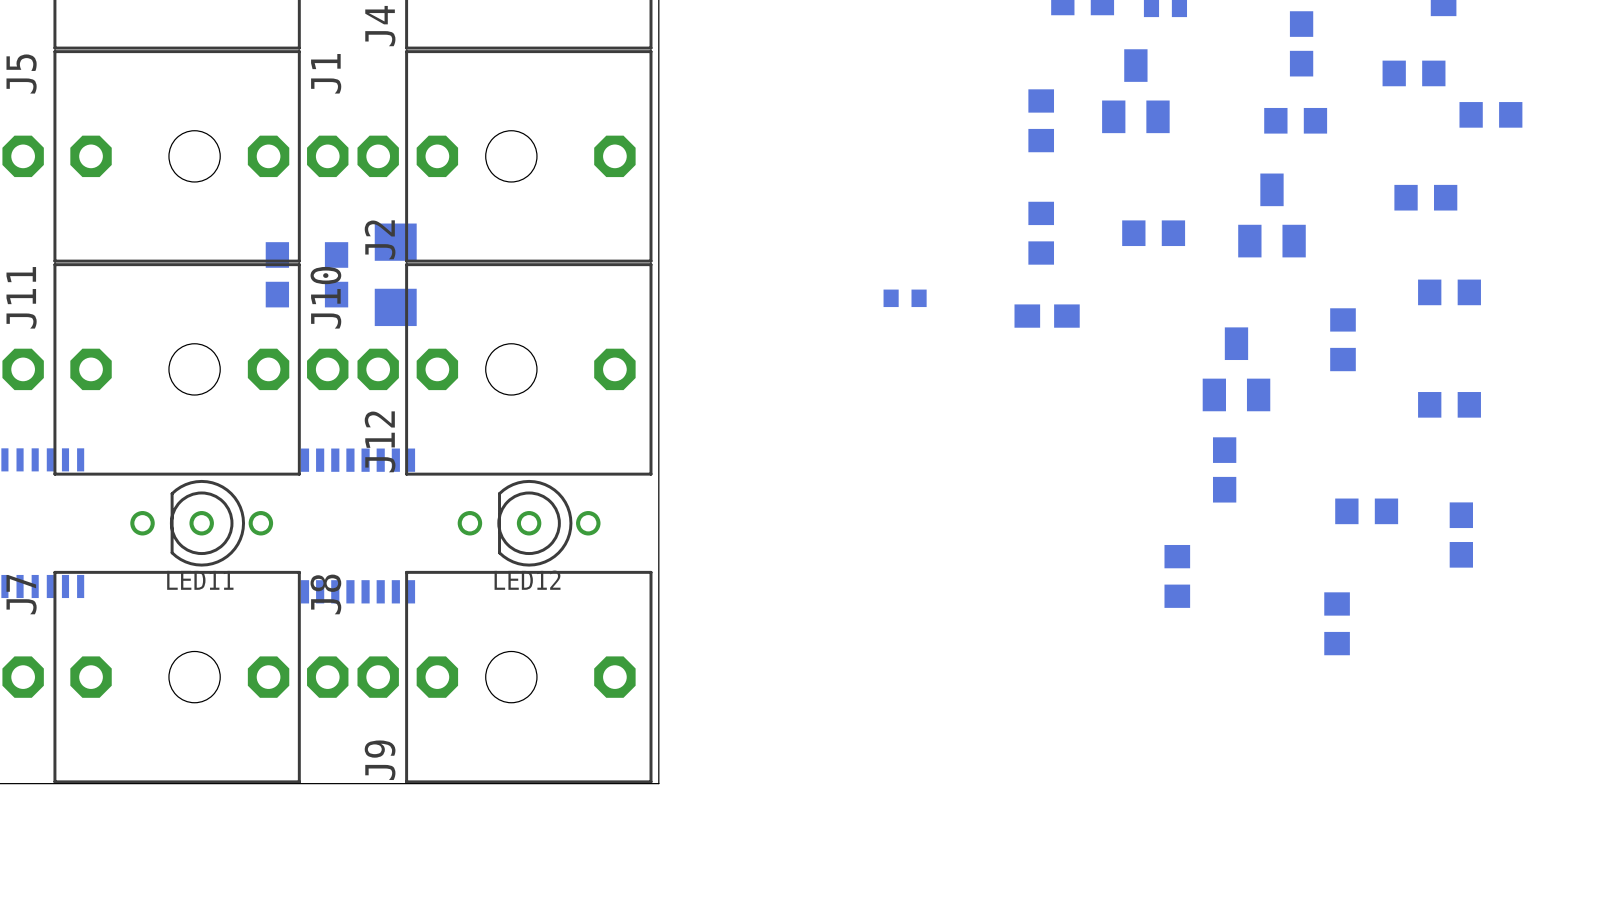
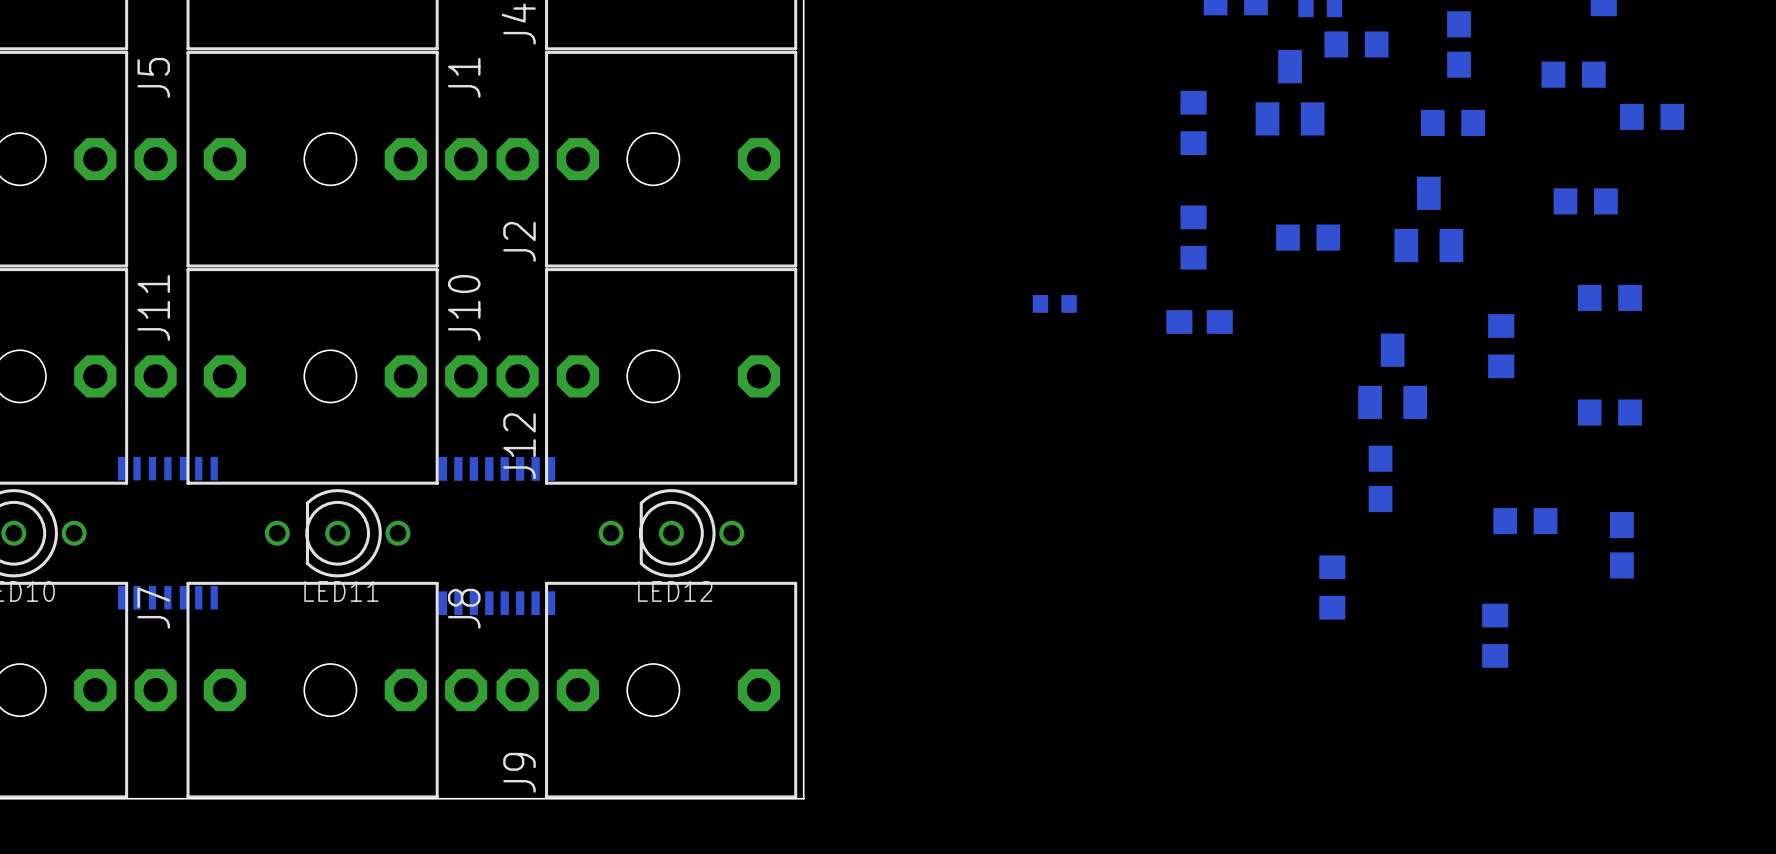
part: none -> (1356, 44)
part: (277, 274) -> none
part: (336, 274) -> none
part: (395, 274) -> none

